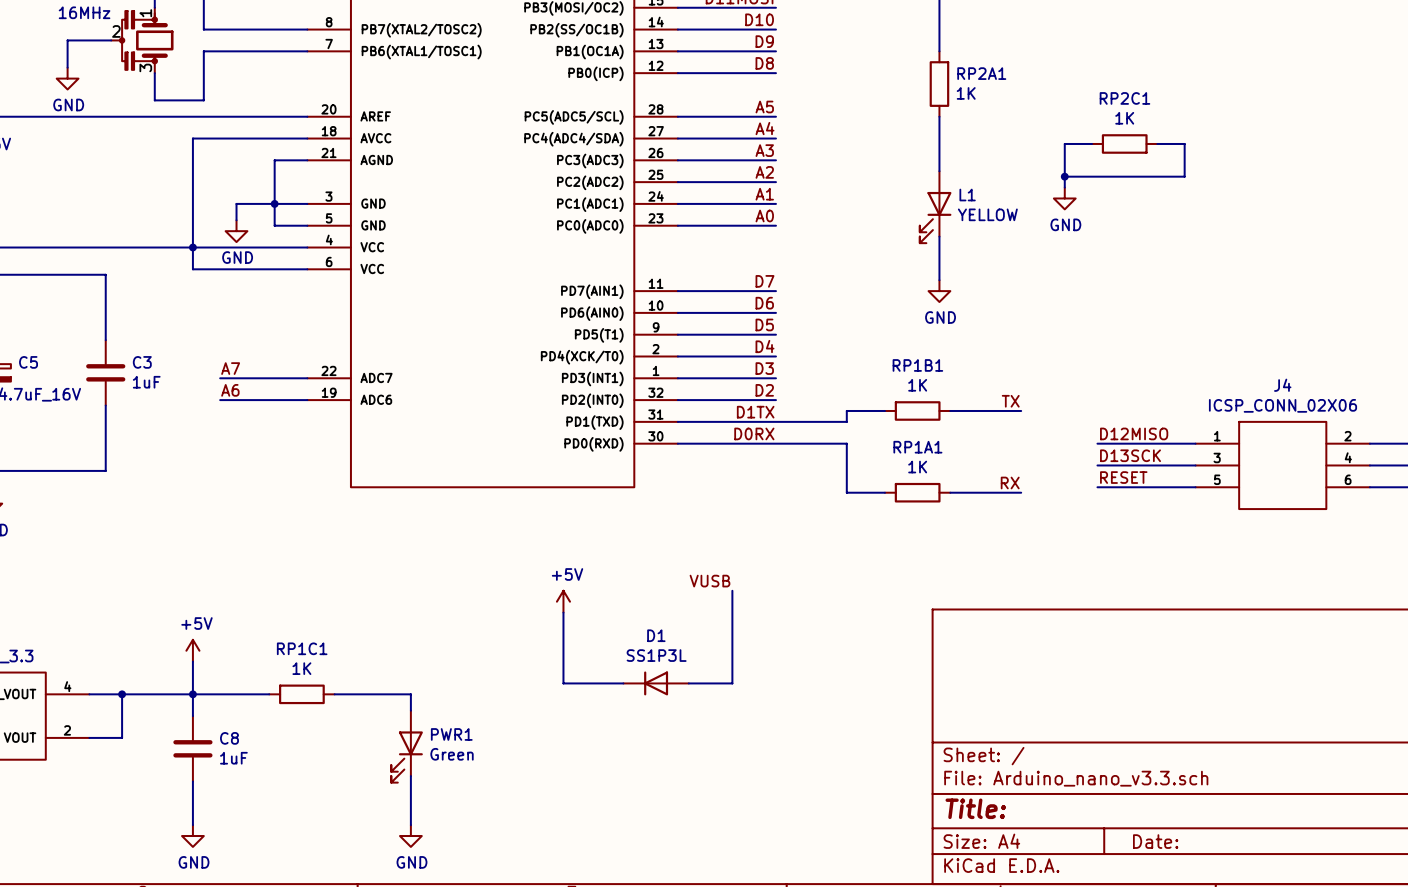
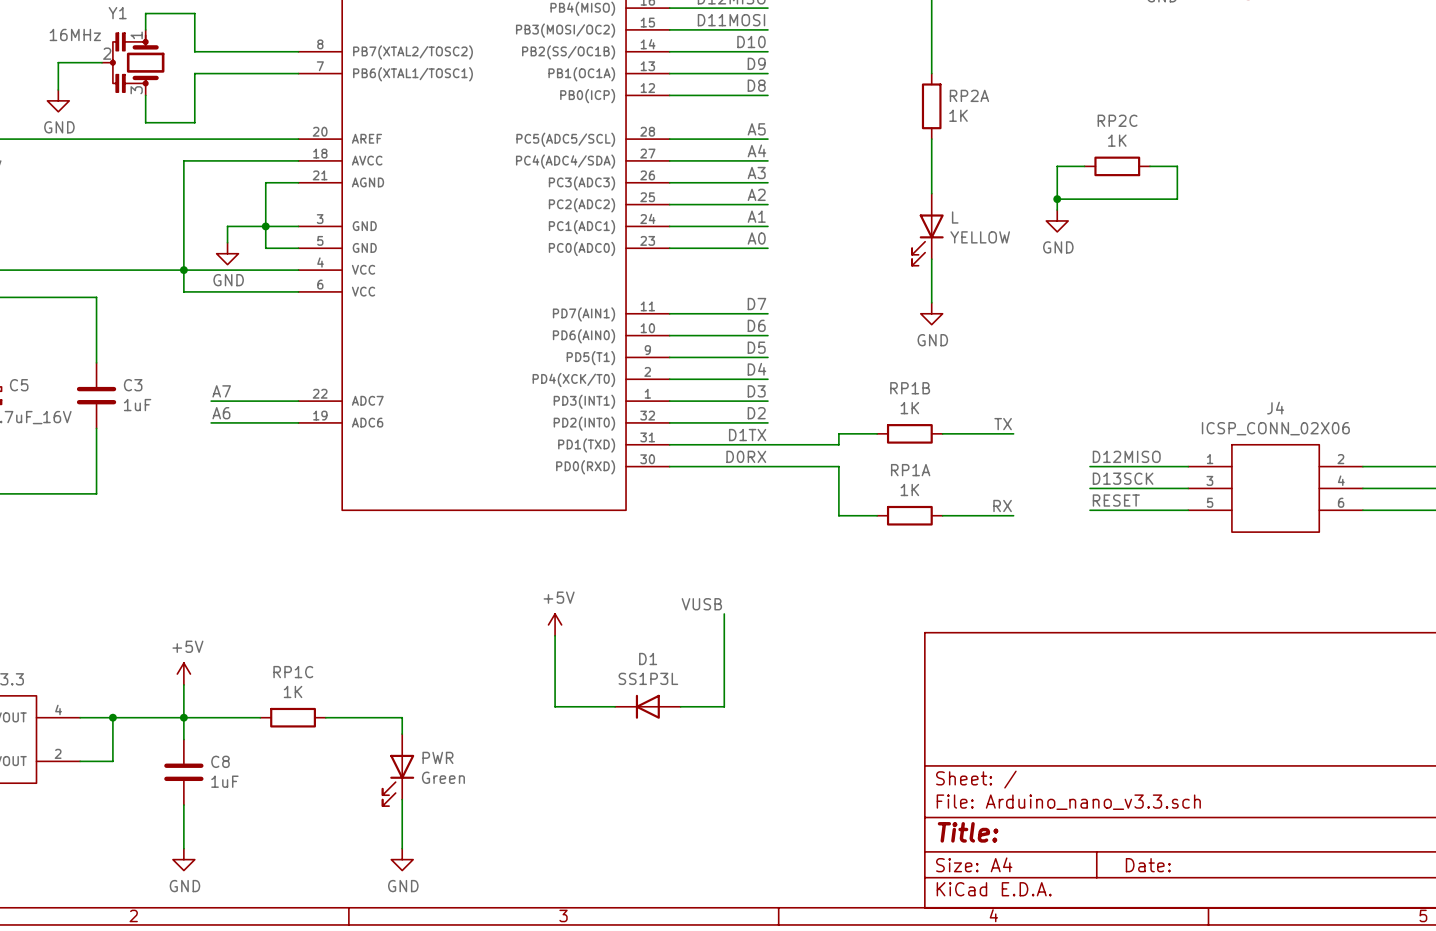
RP2A1 name: RP2A1 (981, 73) -> RP2A (969, 95)
RP2C1 name: RP2C1 (1124, 98) -> RP2C (1117, 120)
L1 name: L1 (967, 195) -> L (955, 217)
RP1B1 name: RP1B1 (917, 365) -> RP1B (910, 388)
RP1A1 name: RP1A1 (917, 447) -> RP1A (910, 470)
RP1C1 name: RP1C1 (302, 648) -> RP1C (293, 672)
PWR1 name: PWR1 (451, 734) -> PWR (437, 757)

